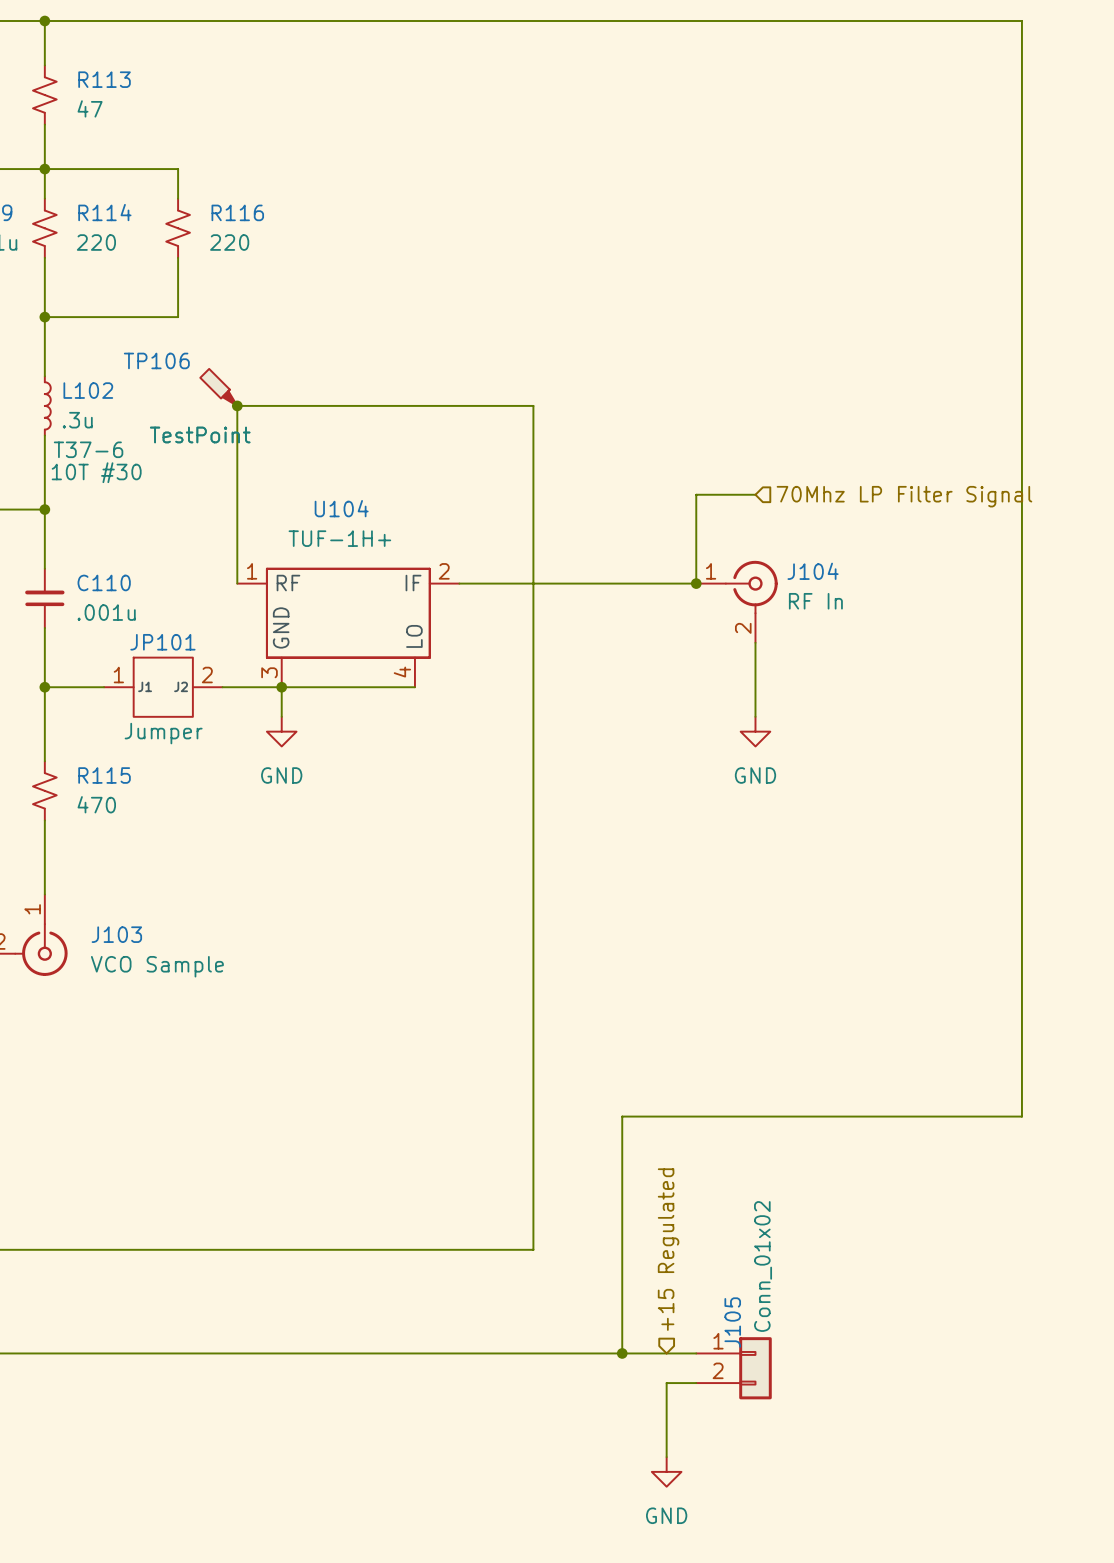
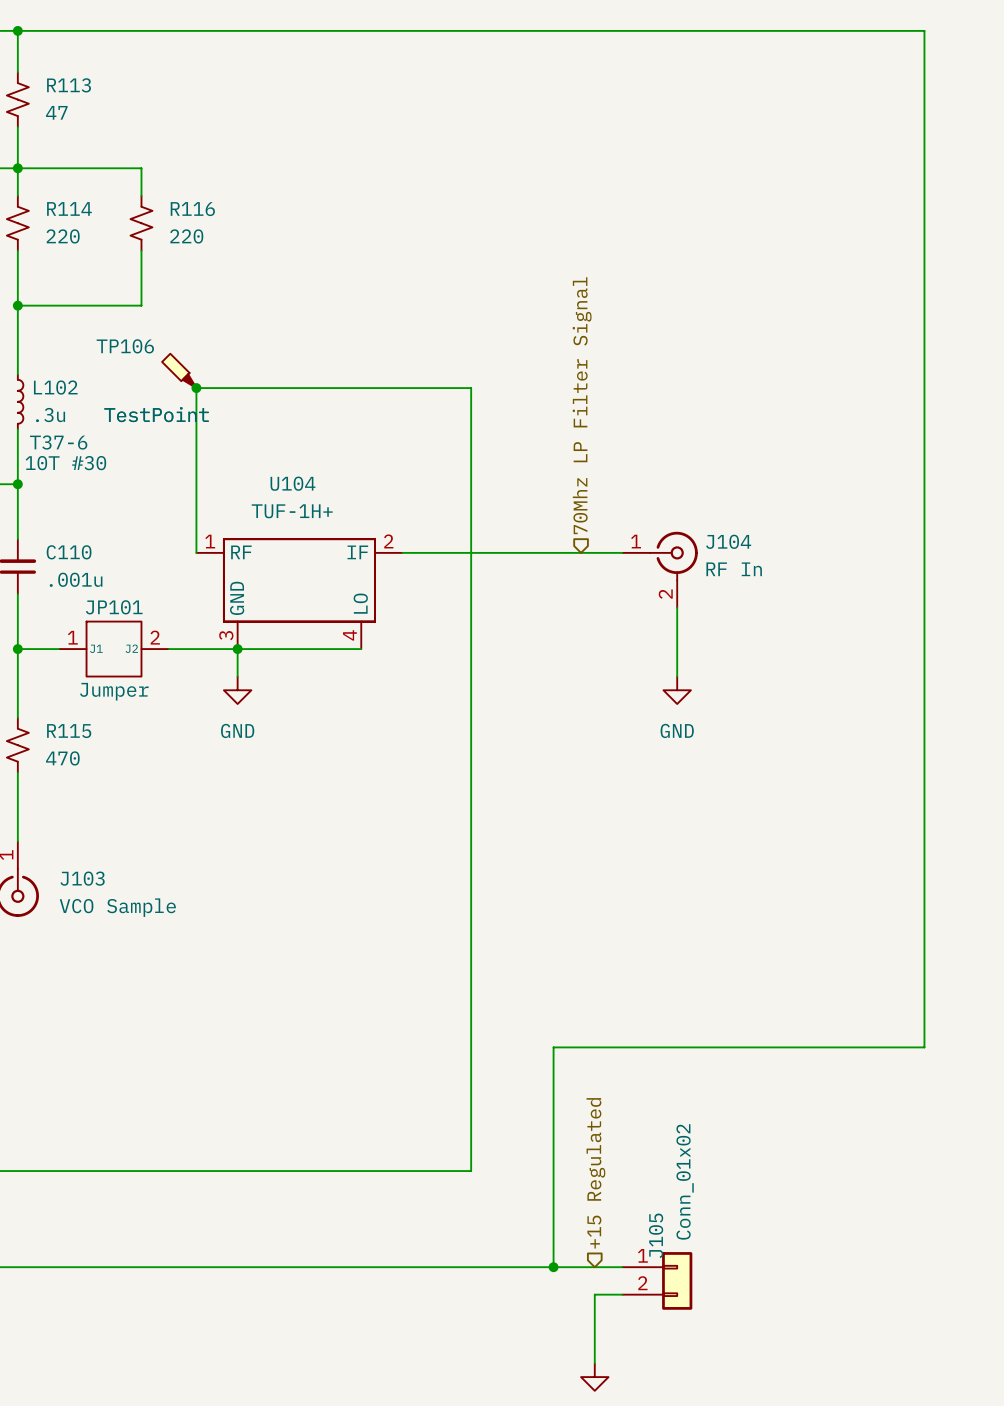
L102 symbol: [44, 376, 51, 436] -> [17, 374, 24, 430]
wire: (44, 435) (44, 450) -> (17, 360) (17, 374)
wire: (755, 494) (696, 494) (696, 583) -> none
hierarchical label rotation: 0° (904, 496) -> 90° counterclockwise (582, 405)
junction: (696, 583) -> none
JP101 position: (163, 687) -> (114, 649)

